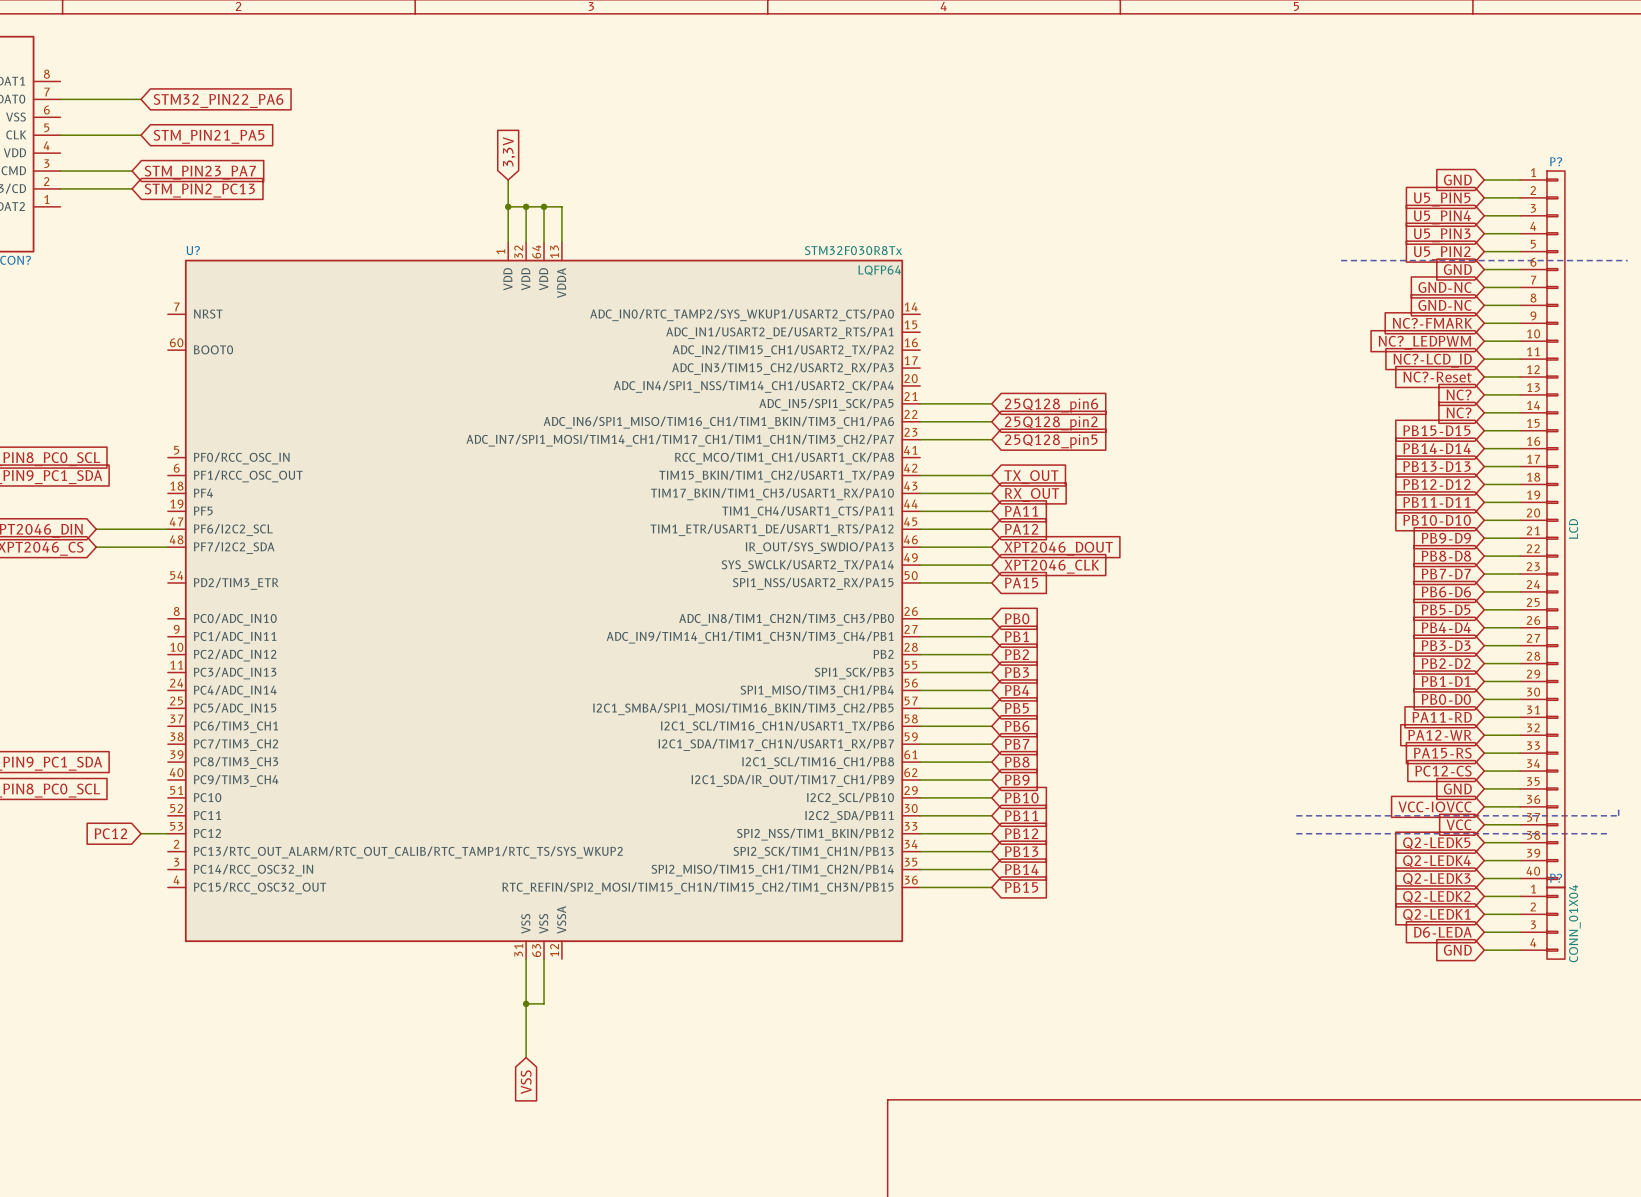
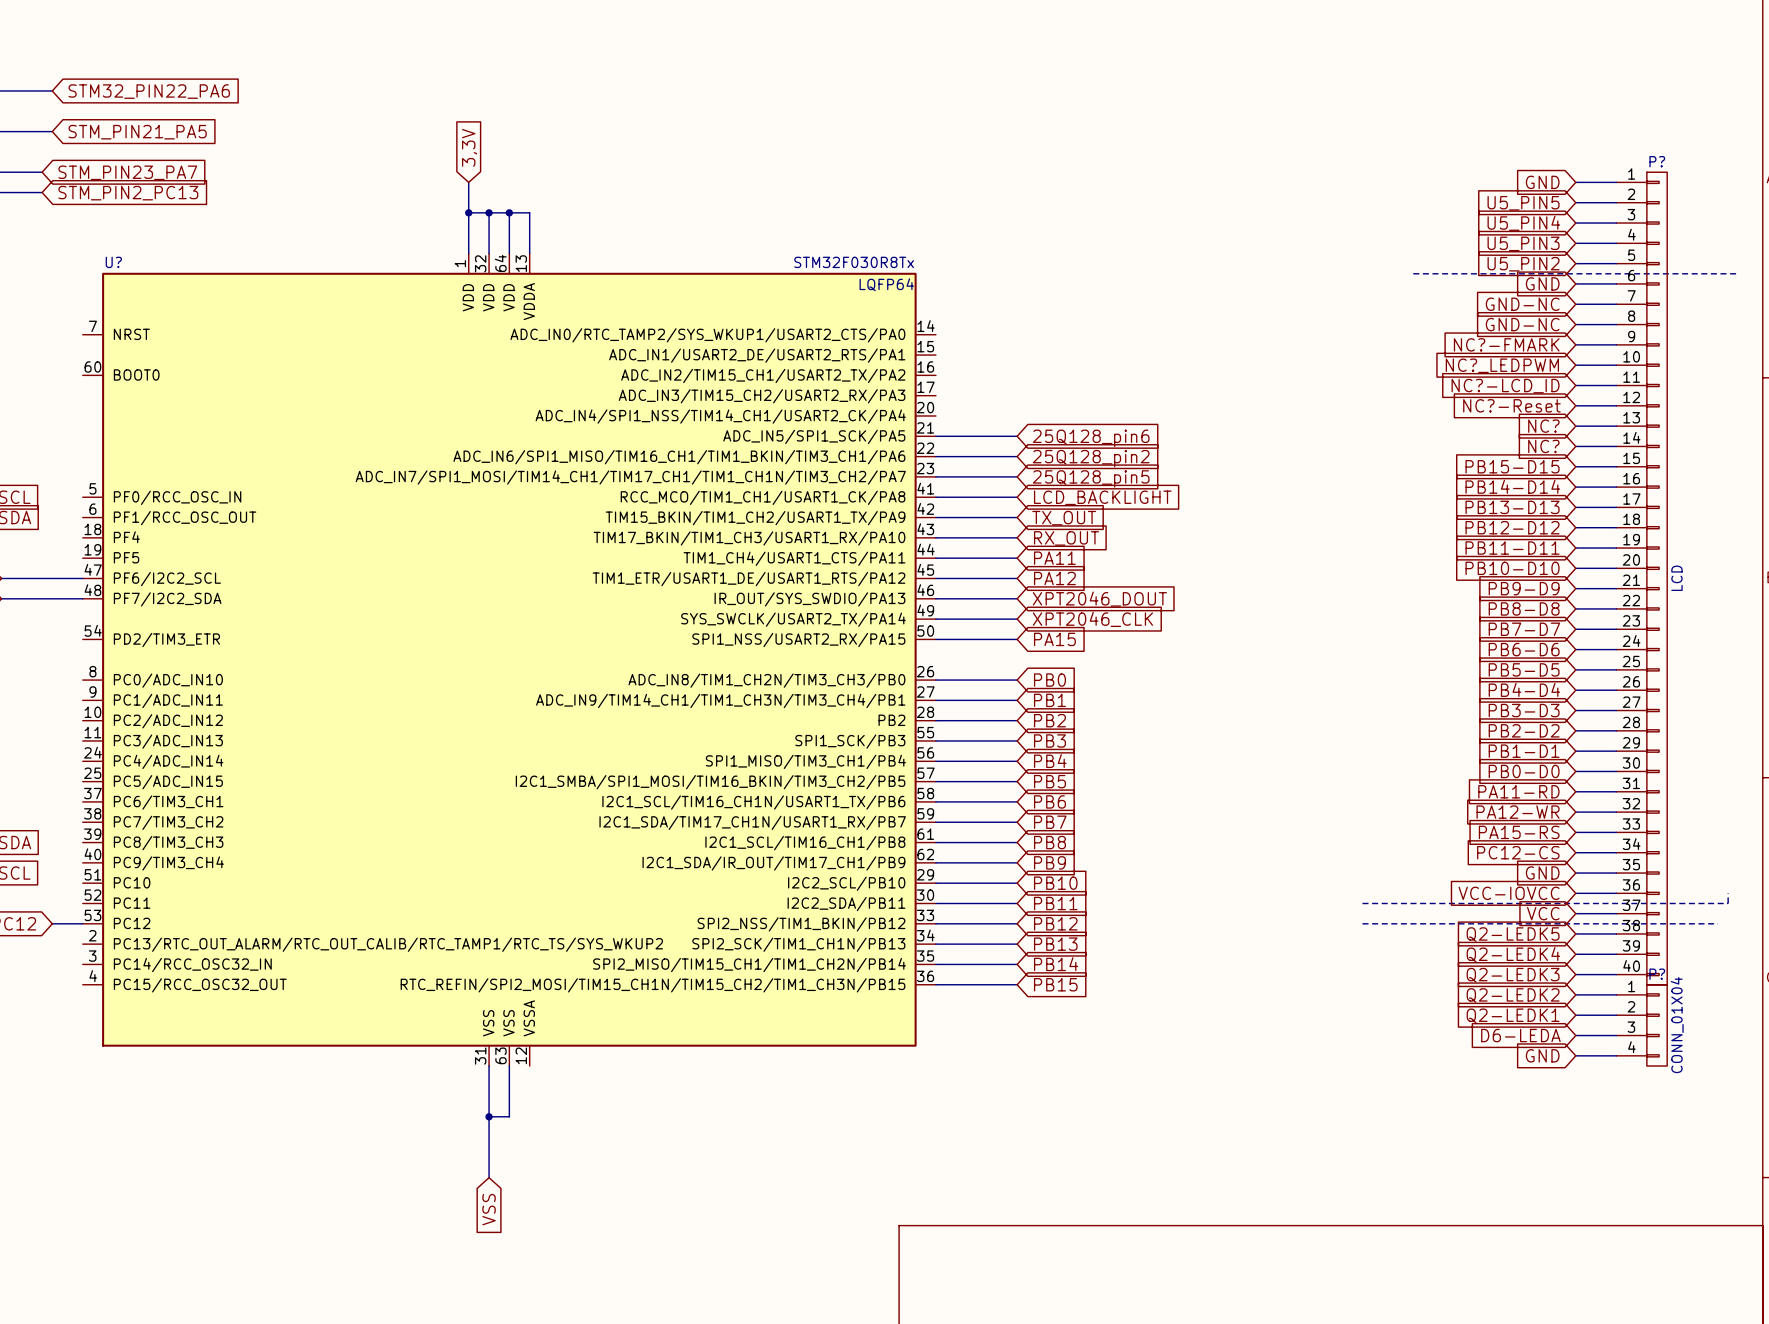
wire: none -> (935, 497) (1017, 497)
global label: none -> LCD_BACKLIGHT (1102, 497)

